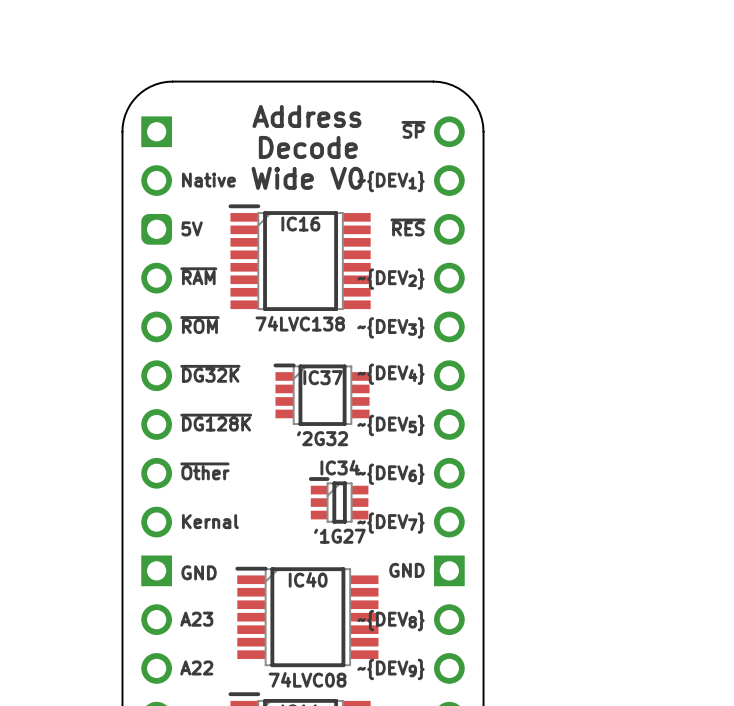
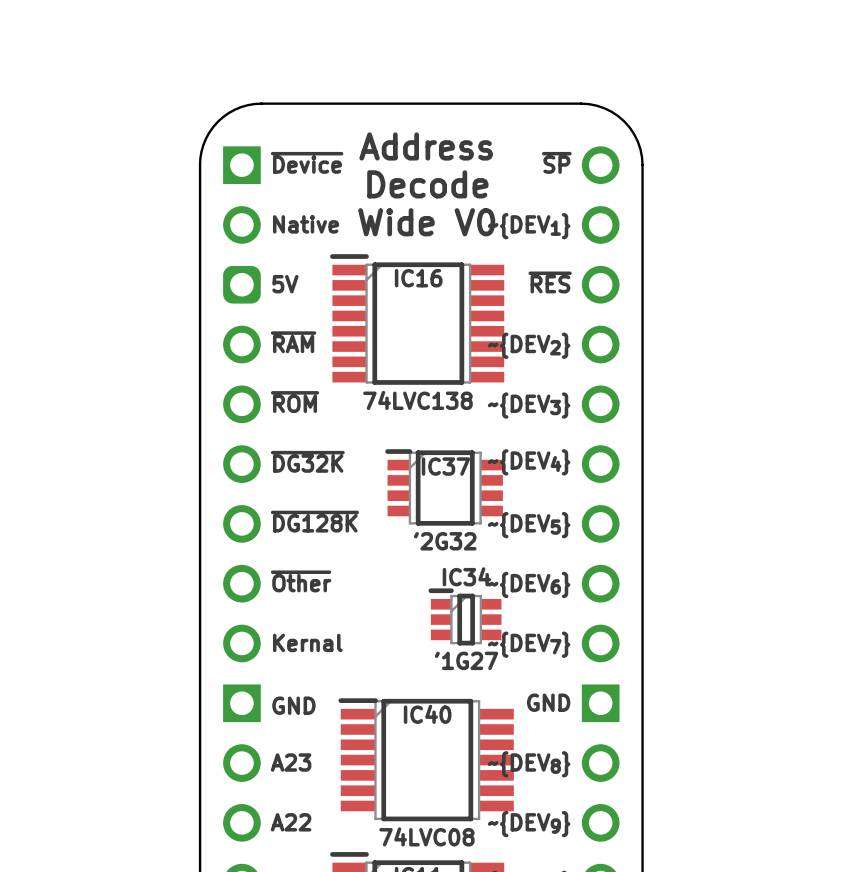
text: none -> ~{Device} (307, 162)

